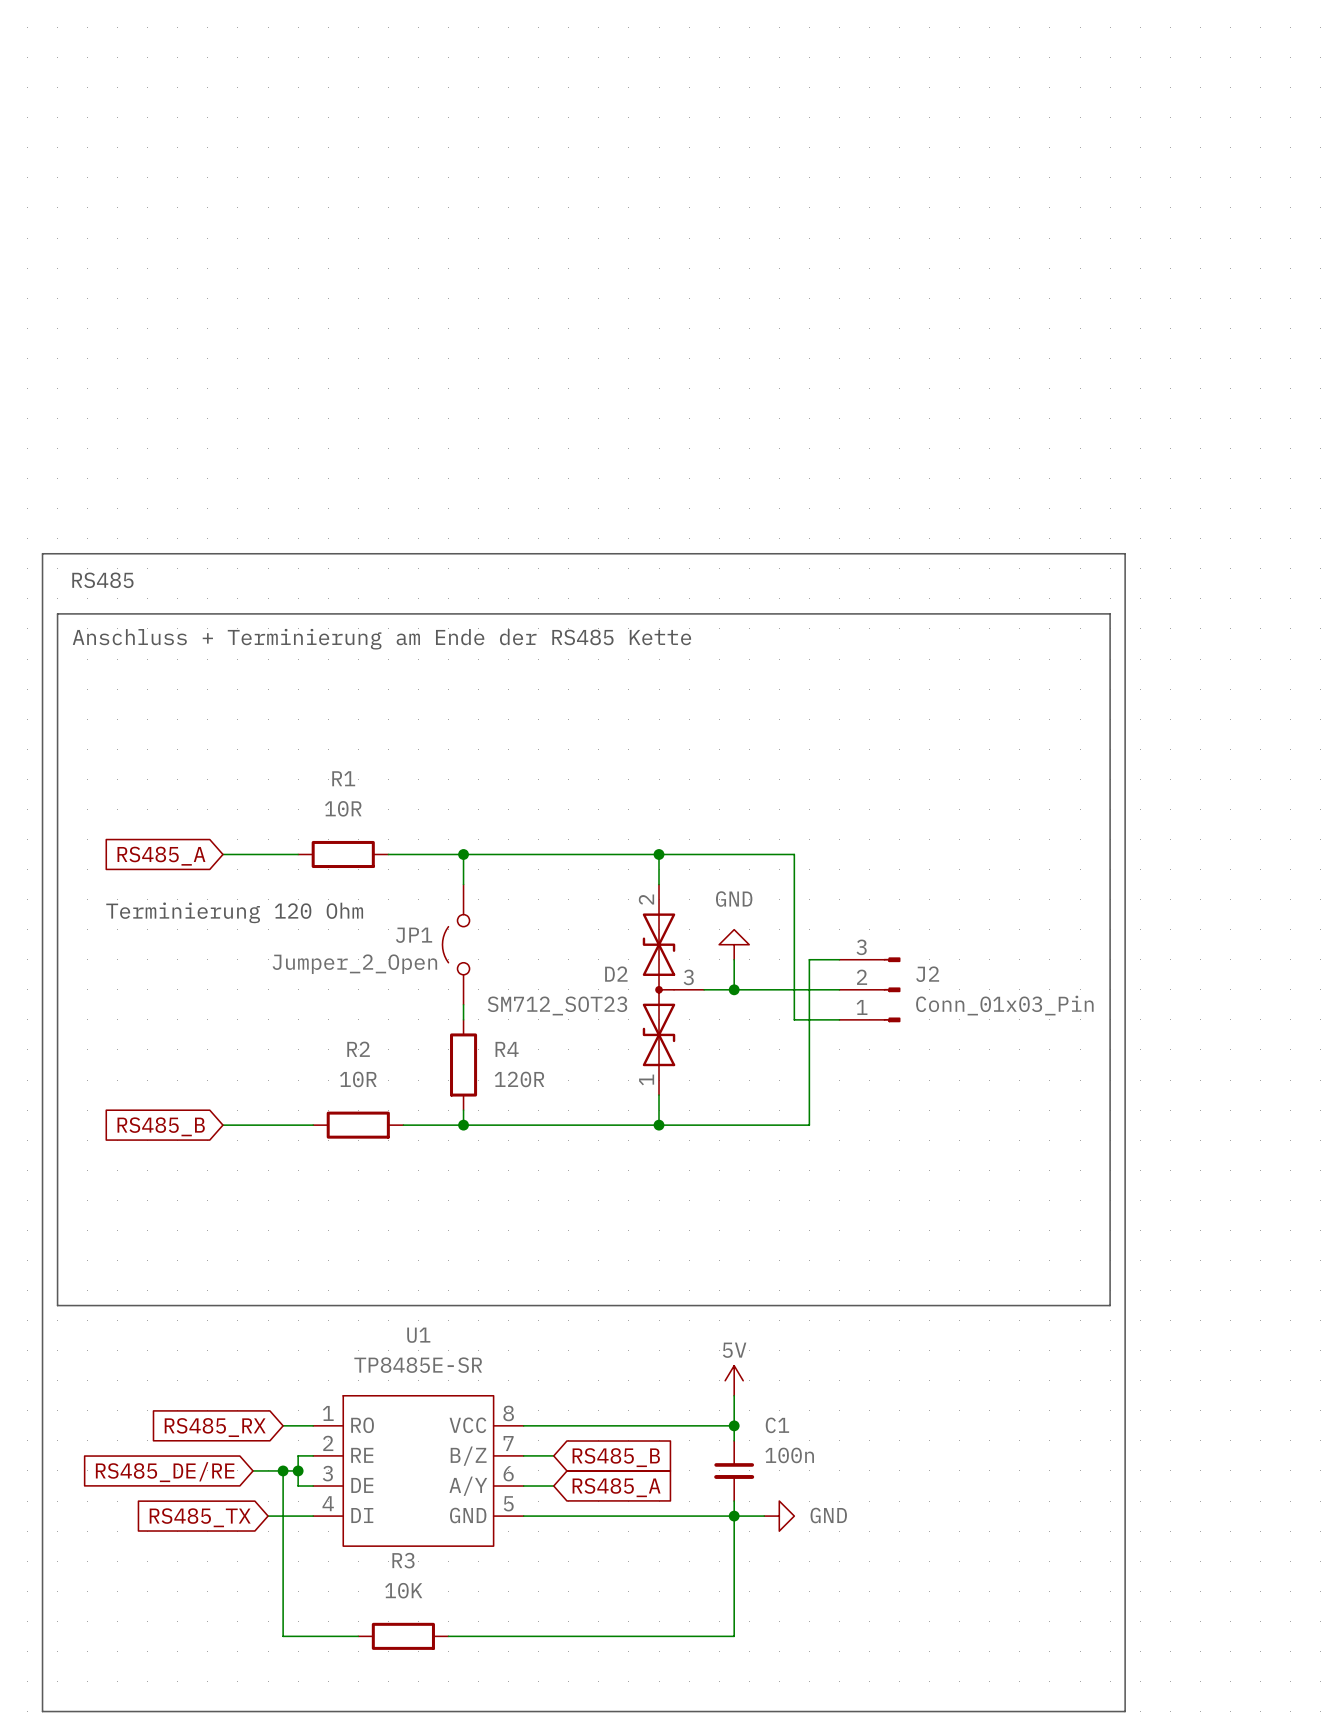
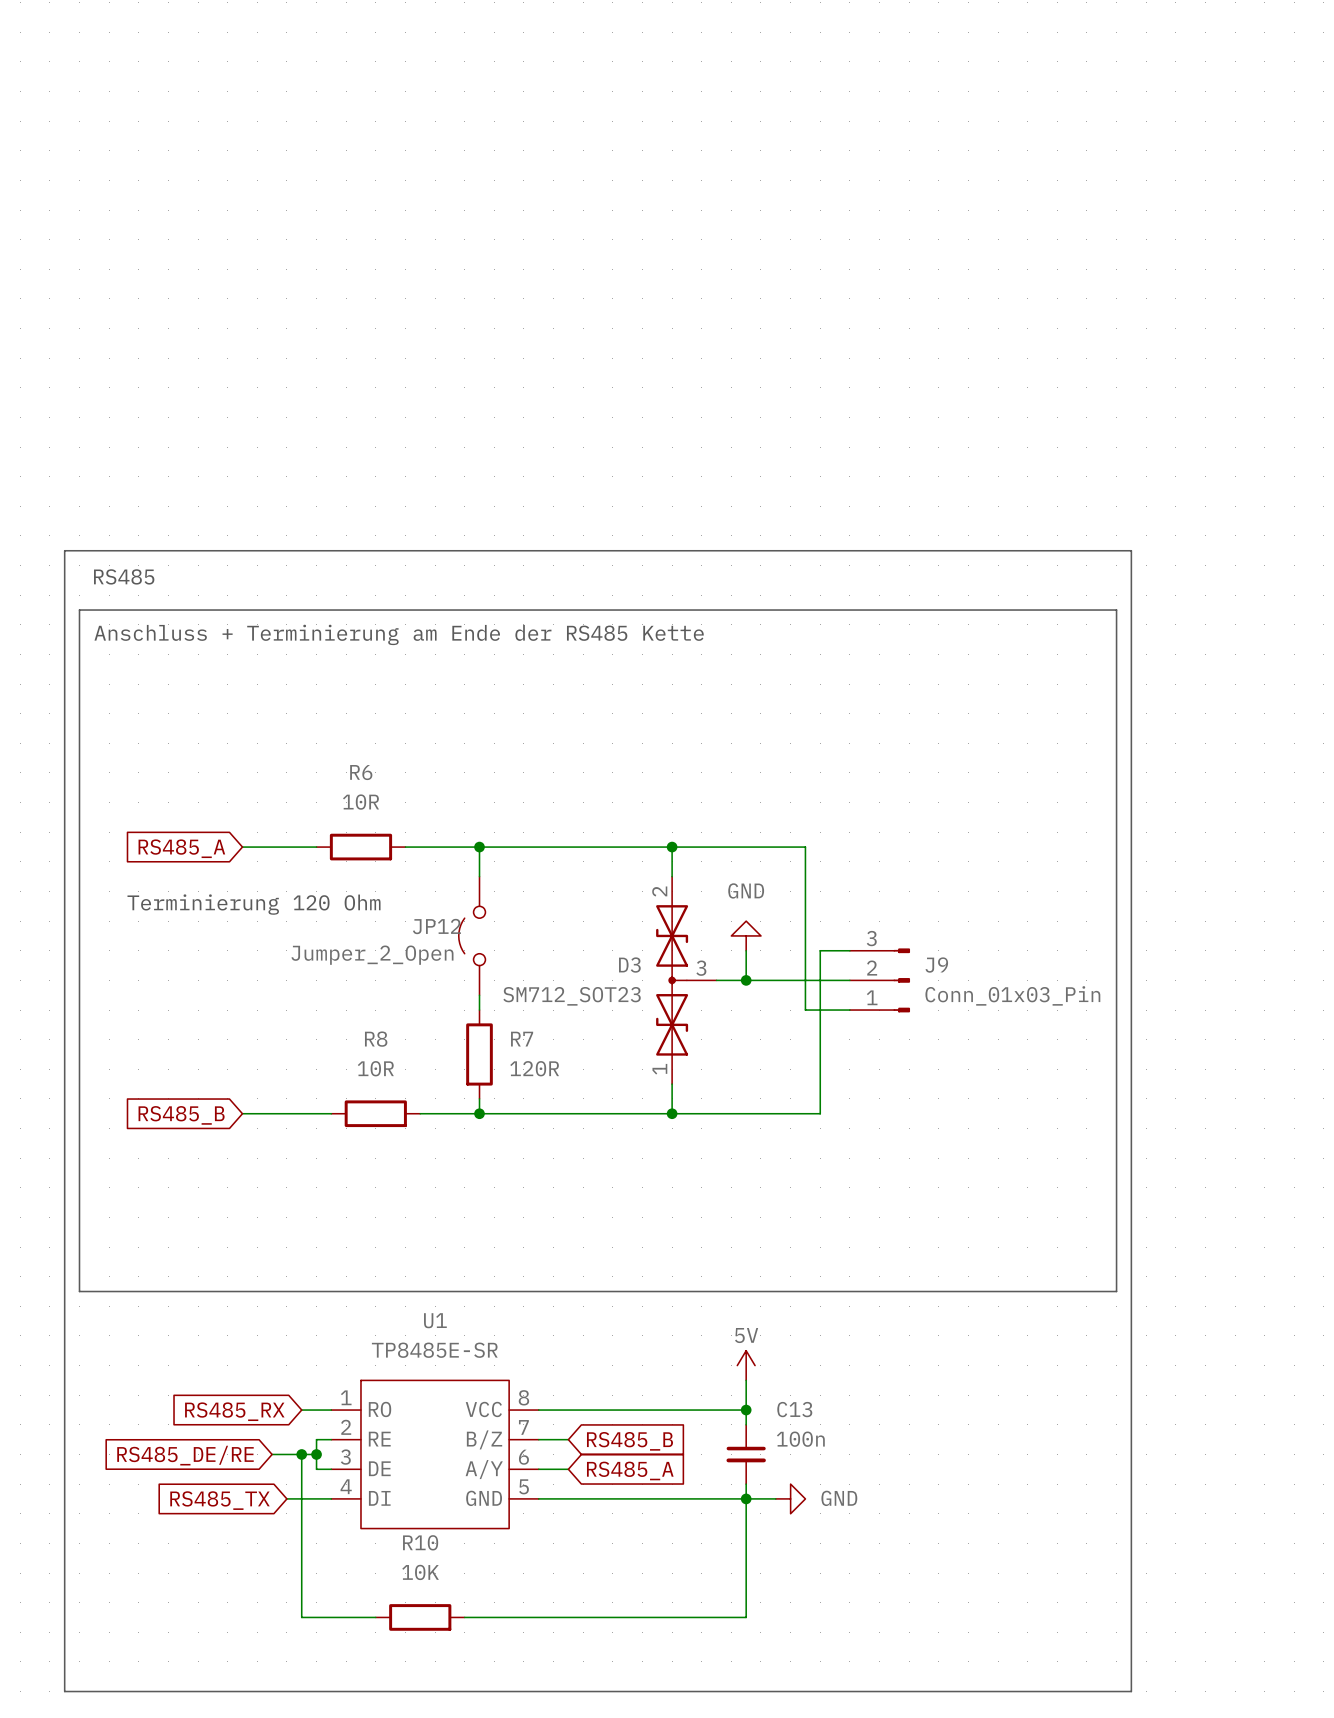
R1 name: R1 (343, 778) -> R6 (361, 772)
JP1 name: JP1 (414, 935) -> JP12 (436, 926)
D2 name: D2 (616, 974) -> D3 (629, 965)
J2 name: J2 (927, 974) -> J9 (936, 965)
R2 name: R2 (358, 1049) -> R8 (376, 1039)
R4 name: R4 (507, 1049) -> R7 (522, 1039)
C1 name: C1 (777, 1425) -> C13 (794, 1409)
R3 name: R3 (403, 1560) -> R10 (420, 1542)

